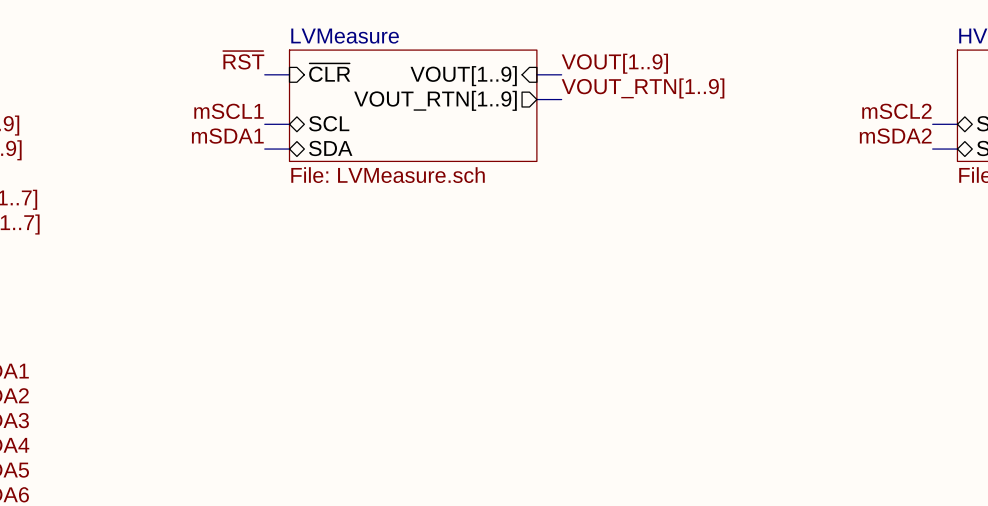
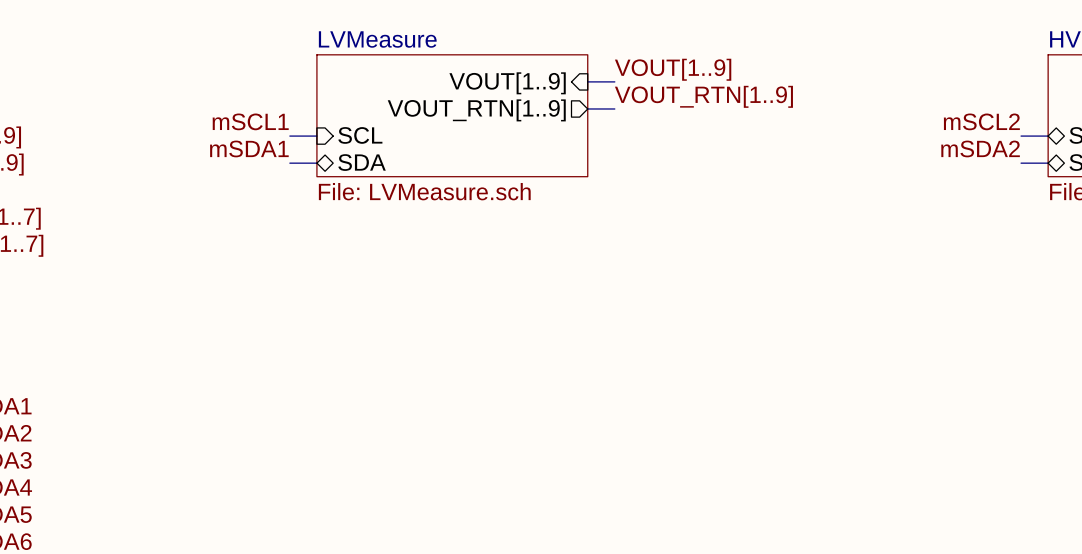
label: ~{RST} (243, 60) -> none
sheet pin: ~{CLR} (329, 72) -> none
wire: (264, 74) (289, 74) -> none
sheet pin shape: bidirectional (329, 123) -> input (360, 135)

